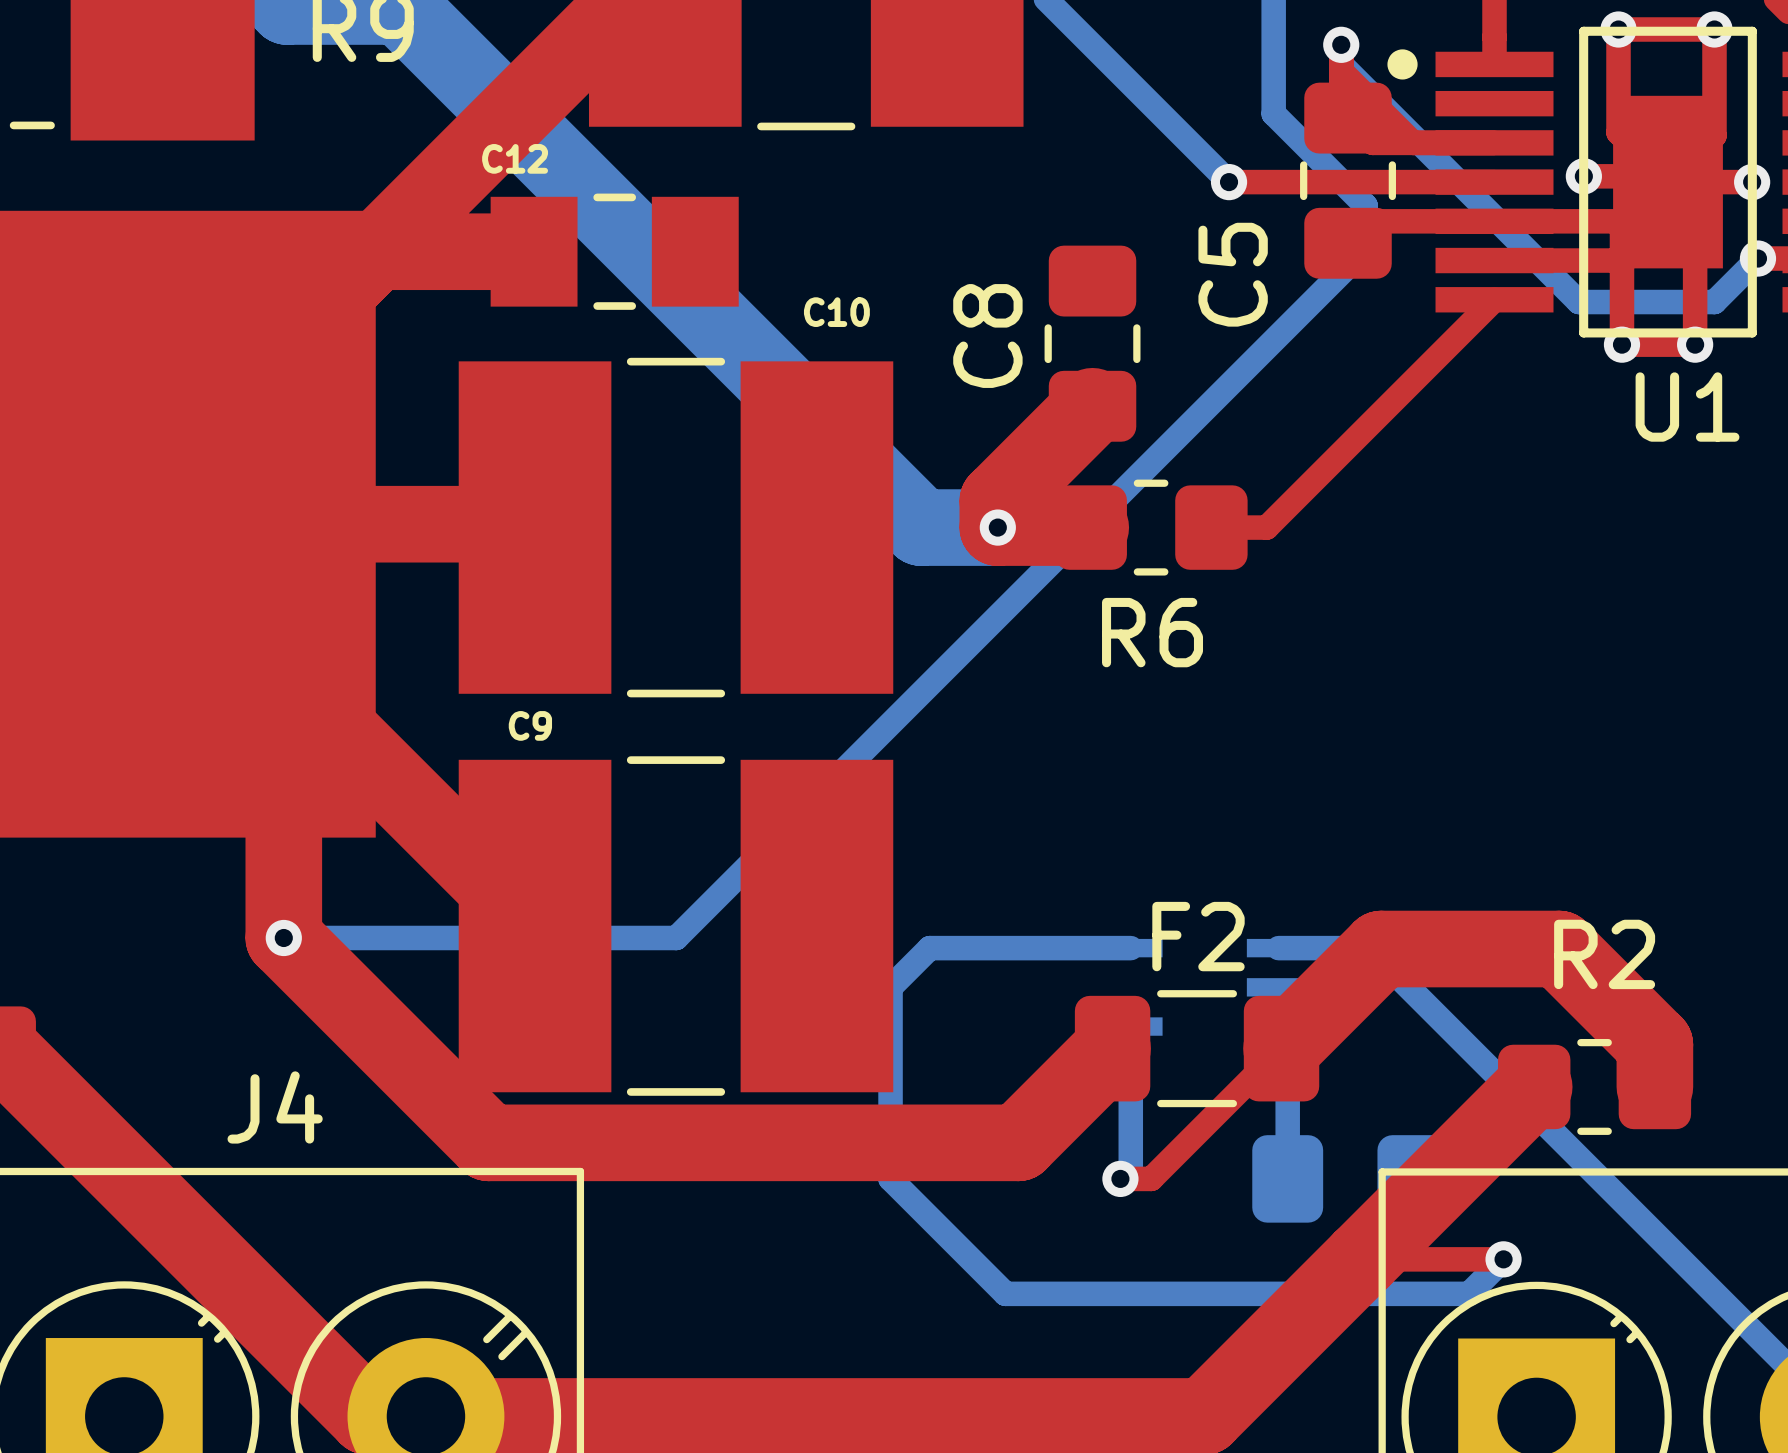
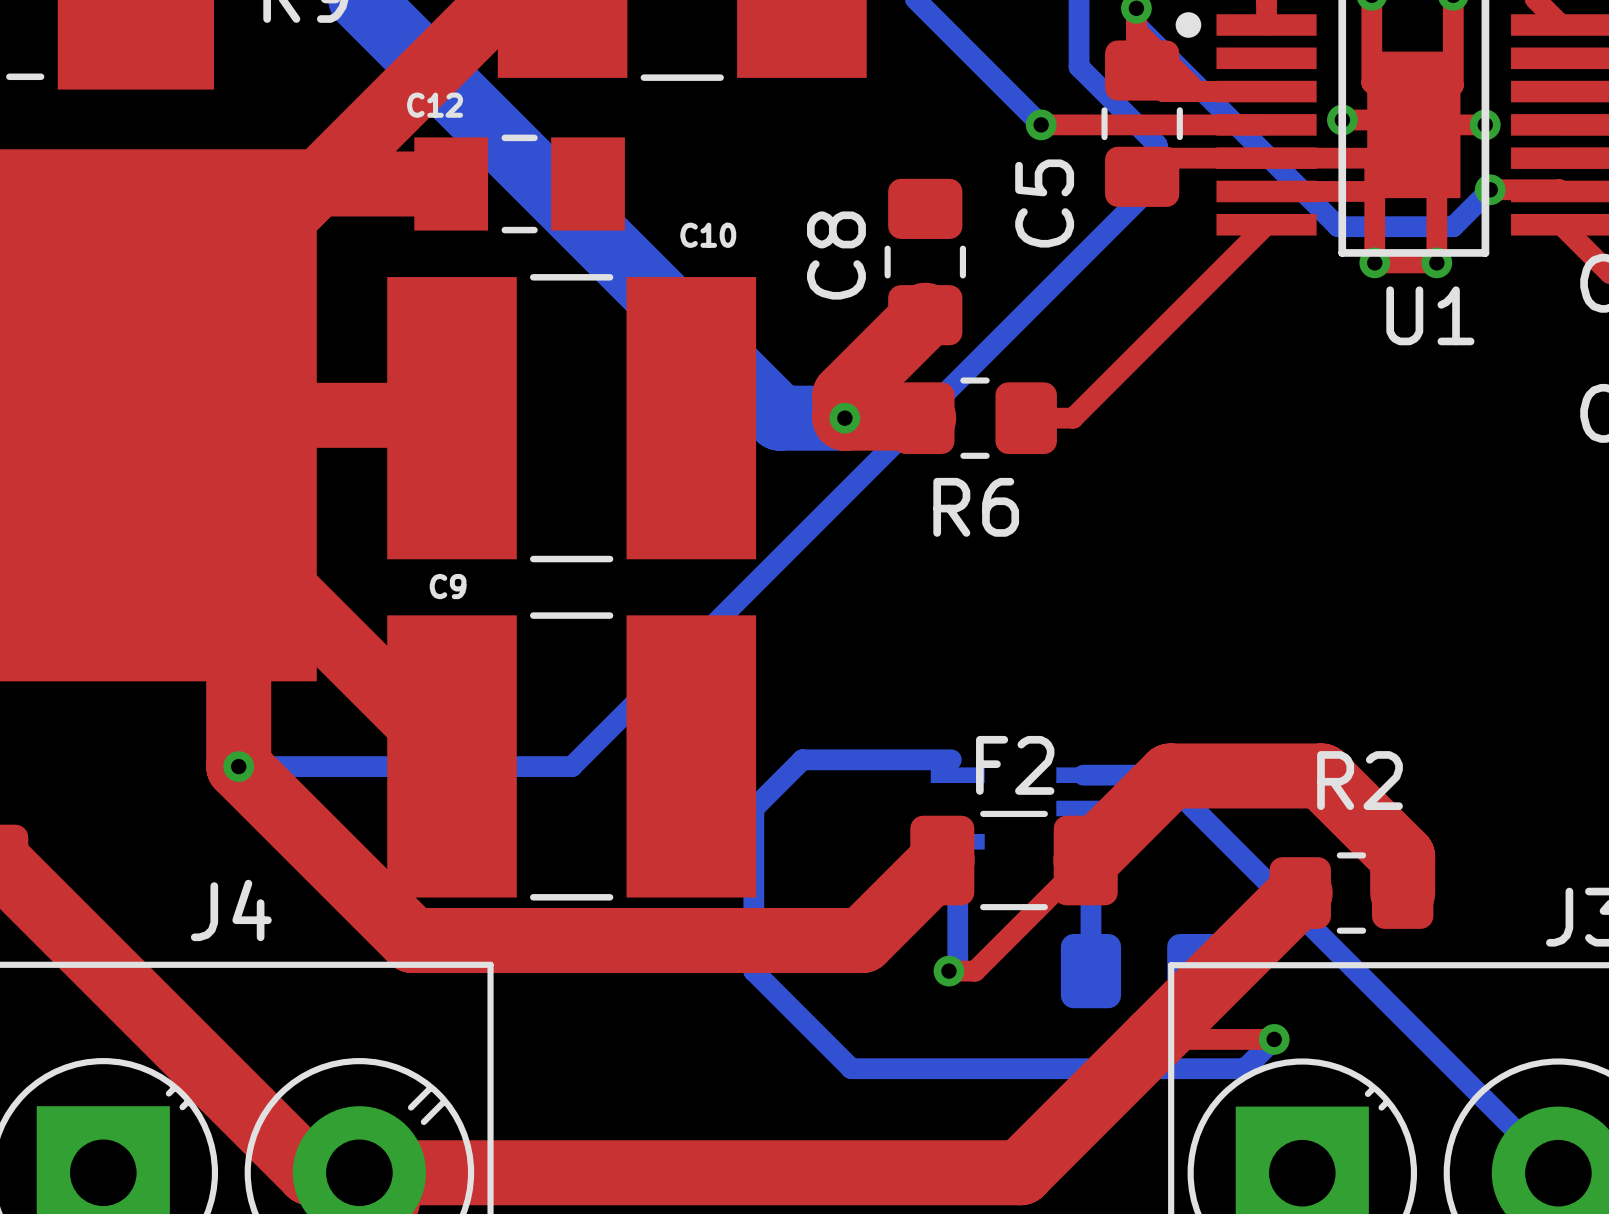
bottom track: (929, 948) (1130, 948) -> (787, 775) (802, 759) (951, 759)

